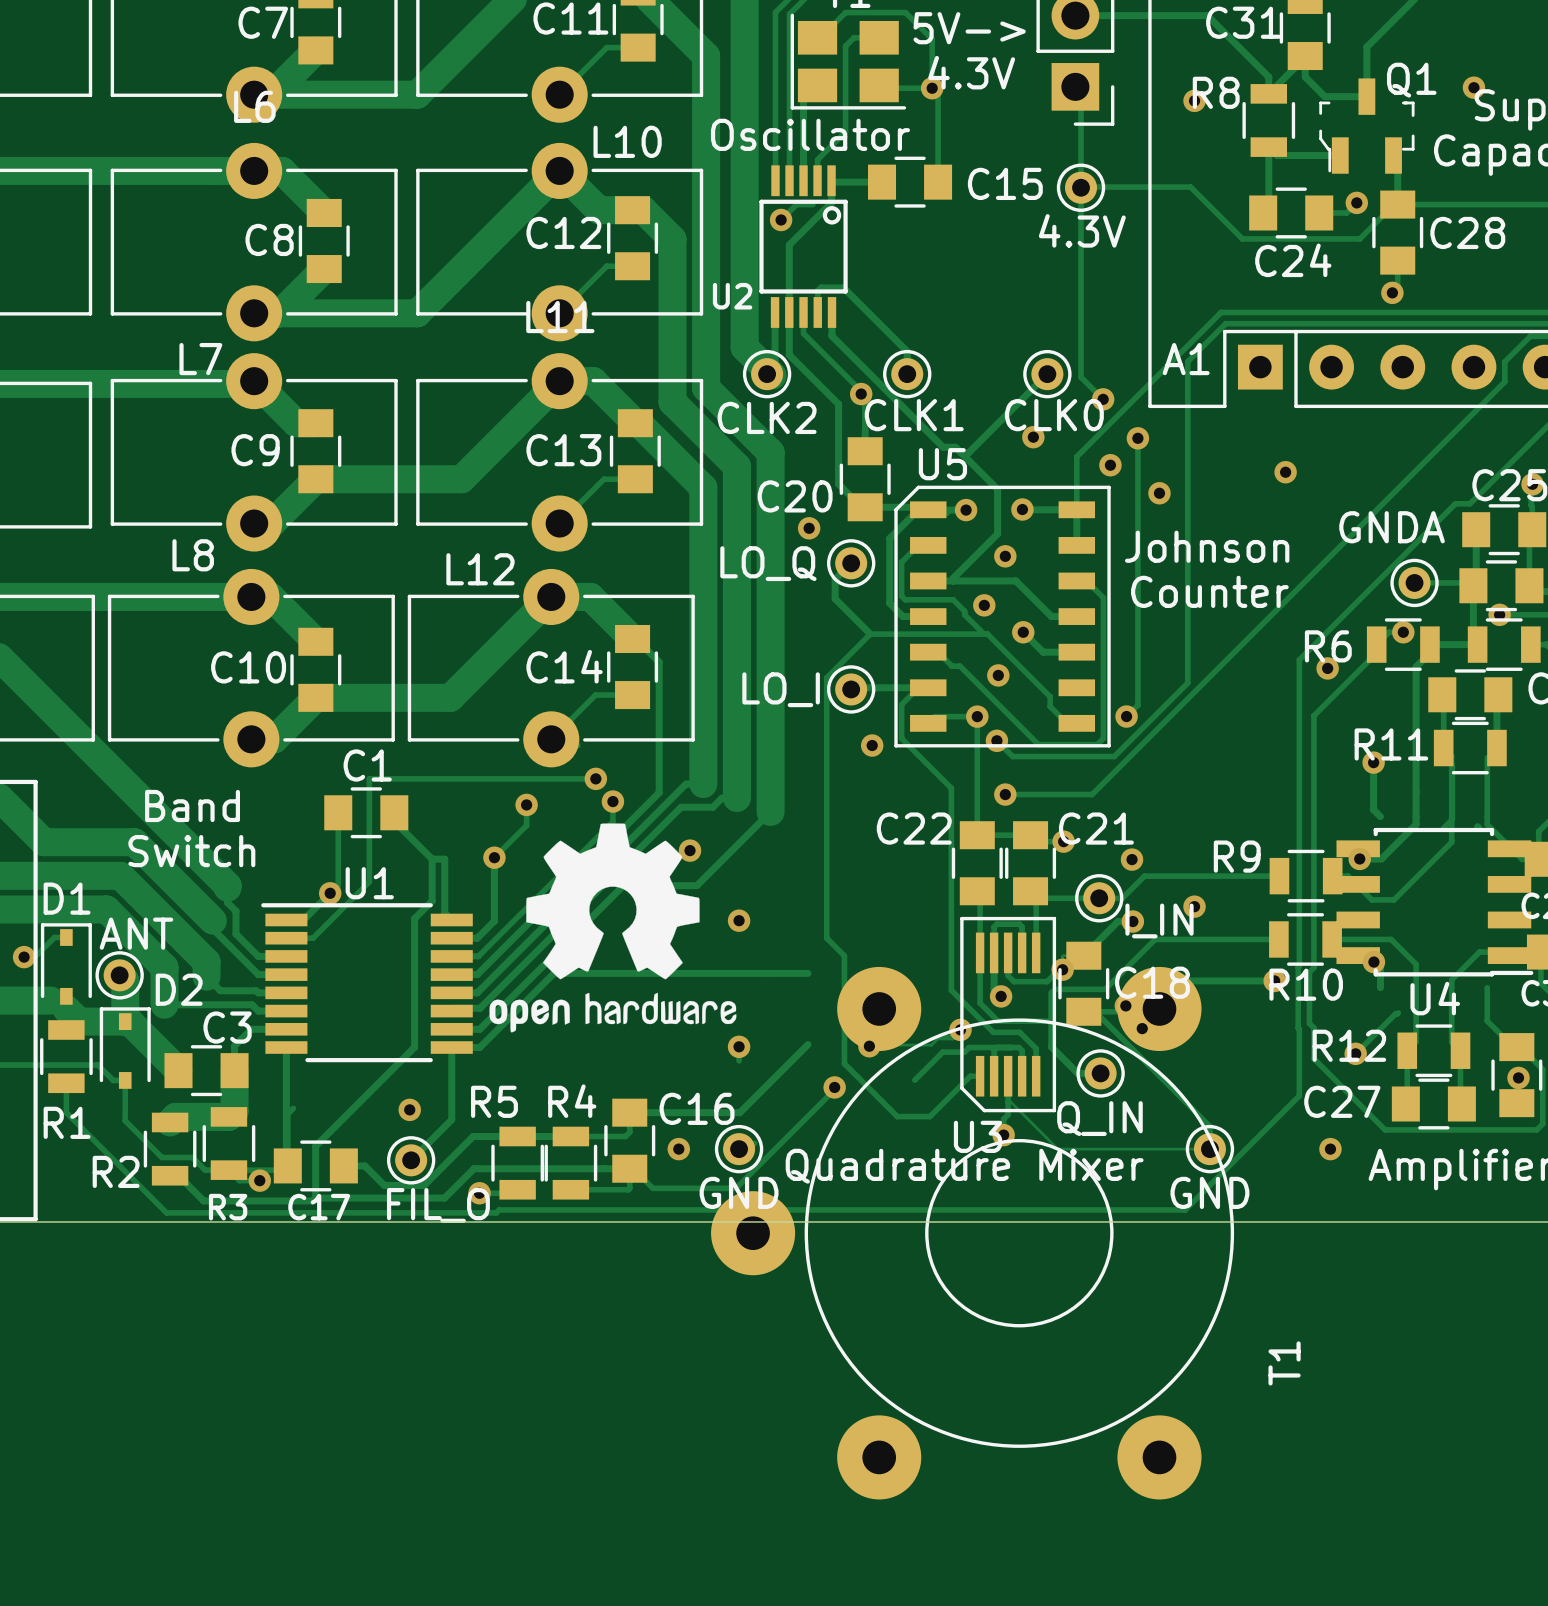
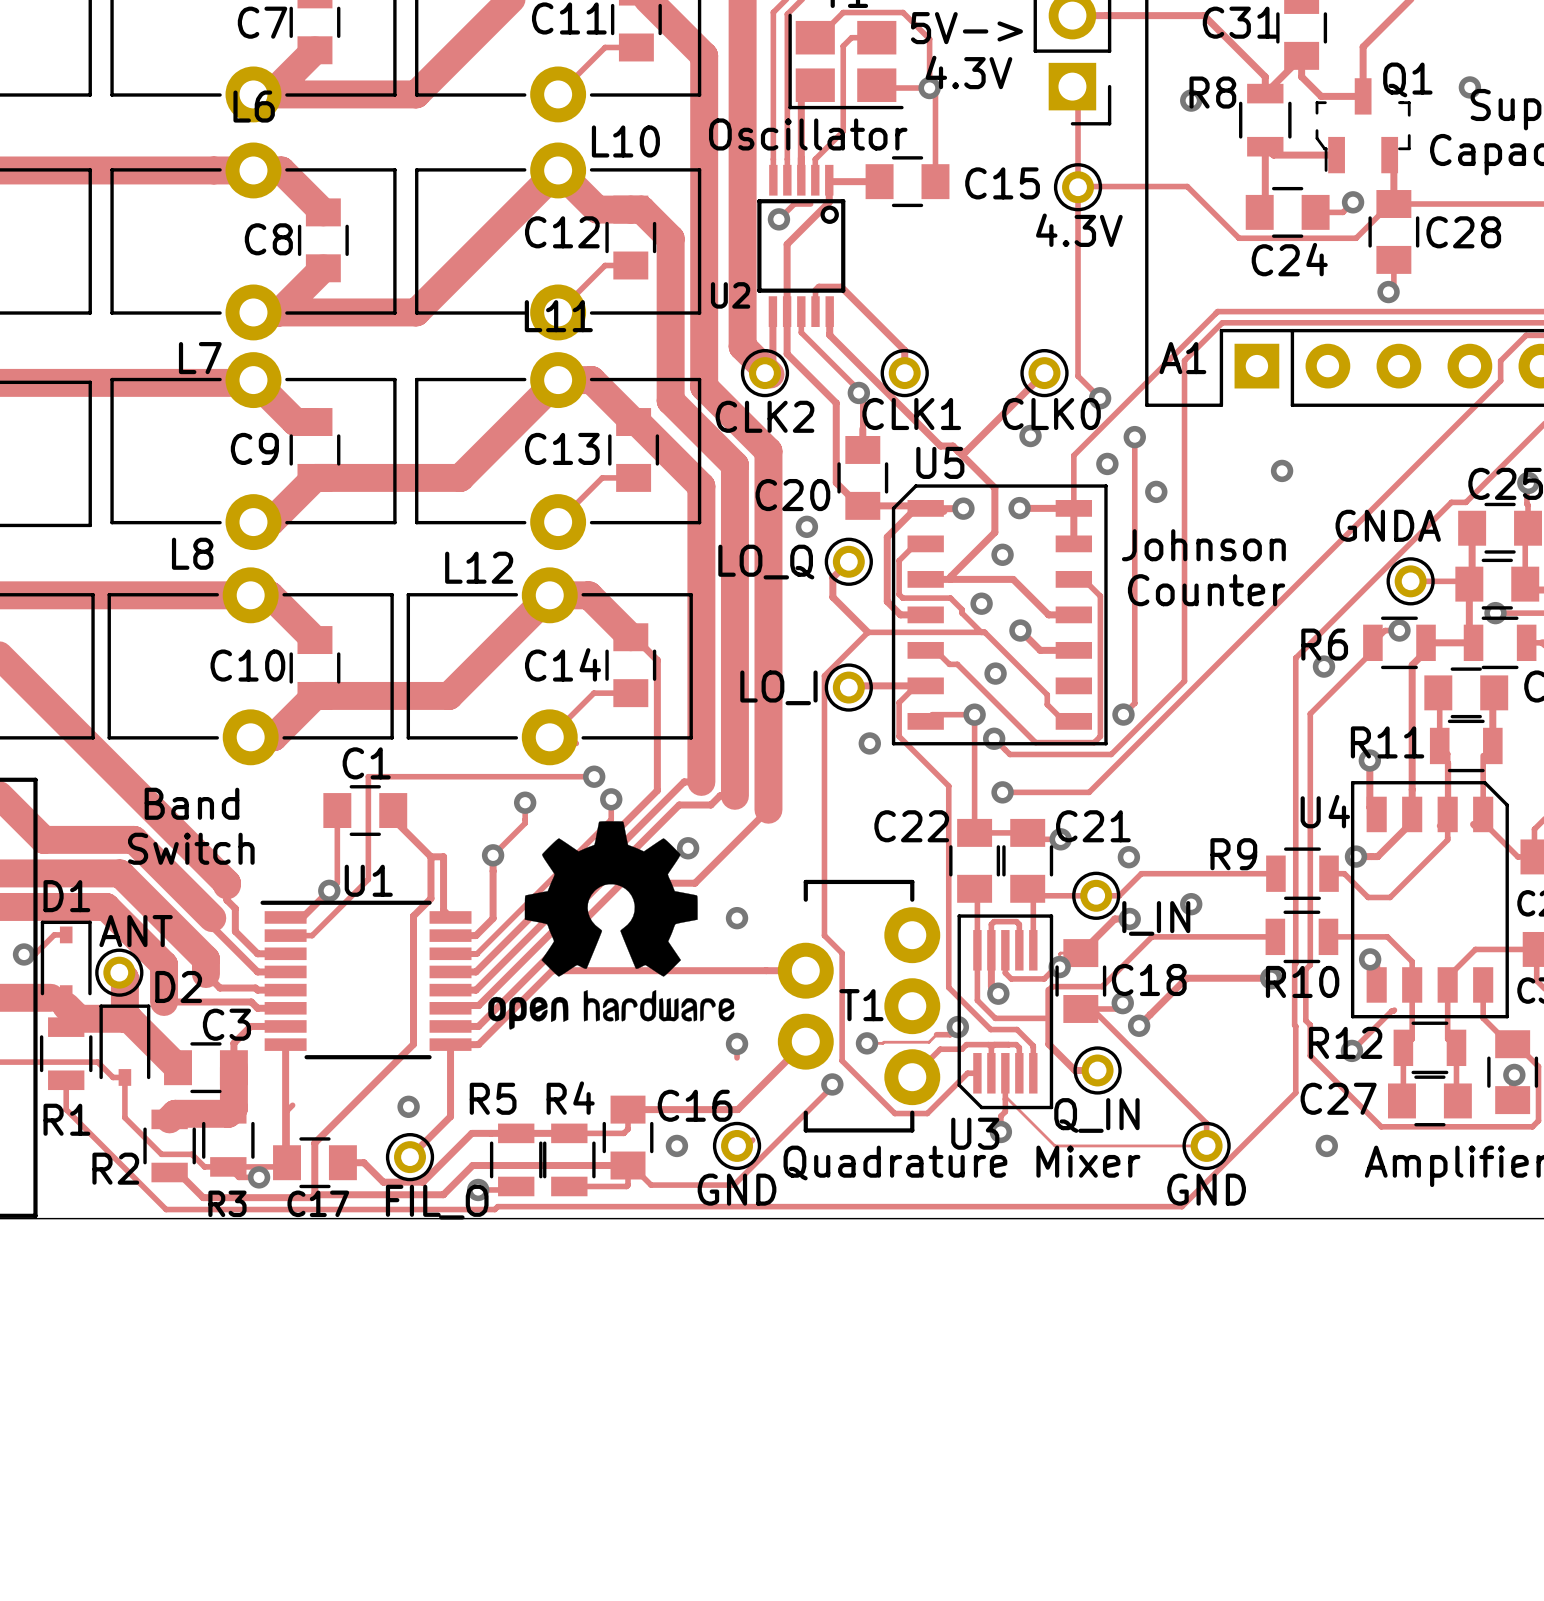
U4 footprint: [1336, 827, 1534, 977] -> [1350, 781, 1509, 1019]
T1 footprint: [711, 966, 1235, 1500] -> [777, 879, 941, 1133]
U4 name position: U4 (1435, 998) -> U4 (1325, 811)
T1 name position: T1 (1284, 1363) -> T1 (861, 1005)

